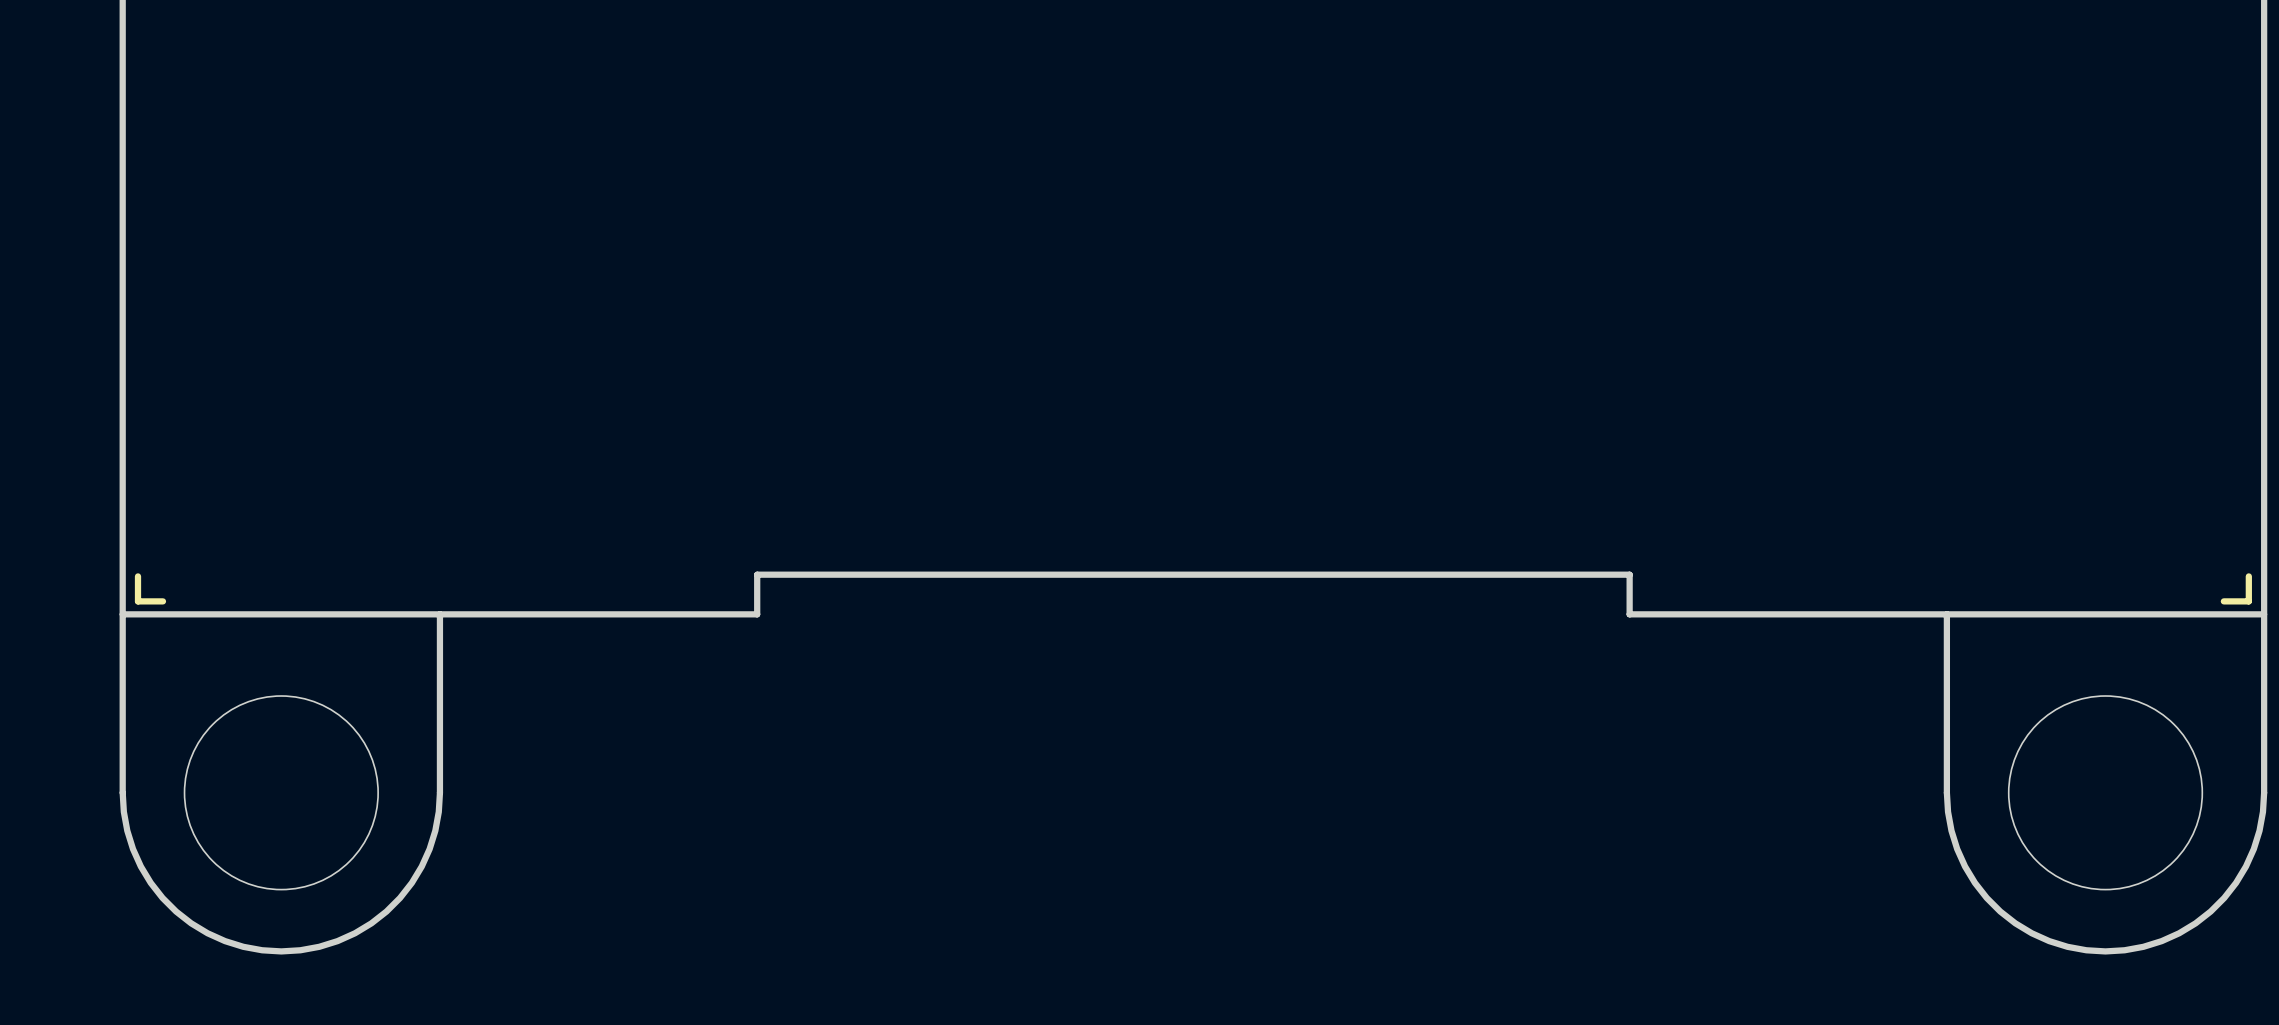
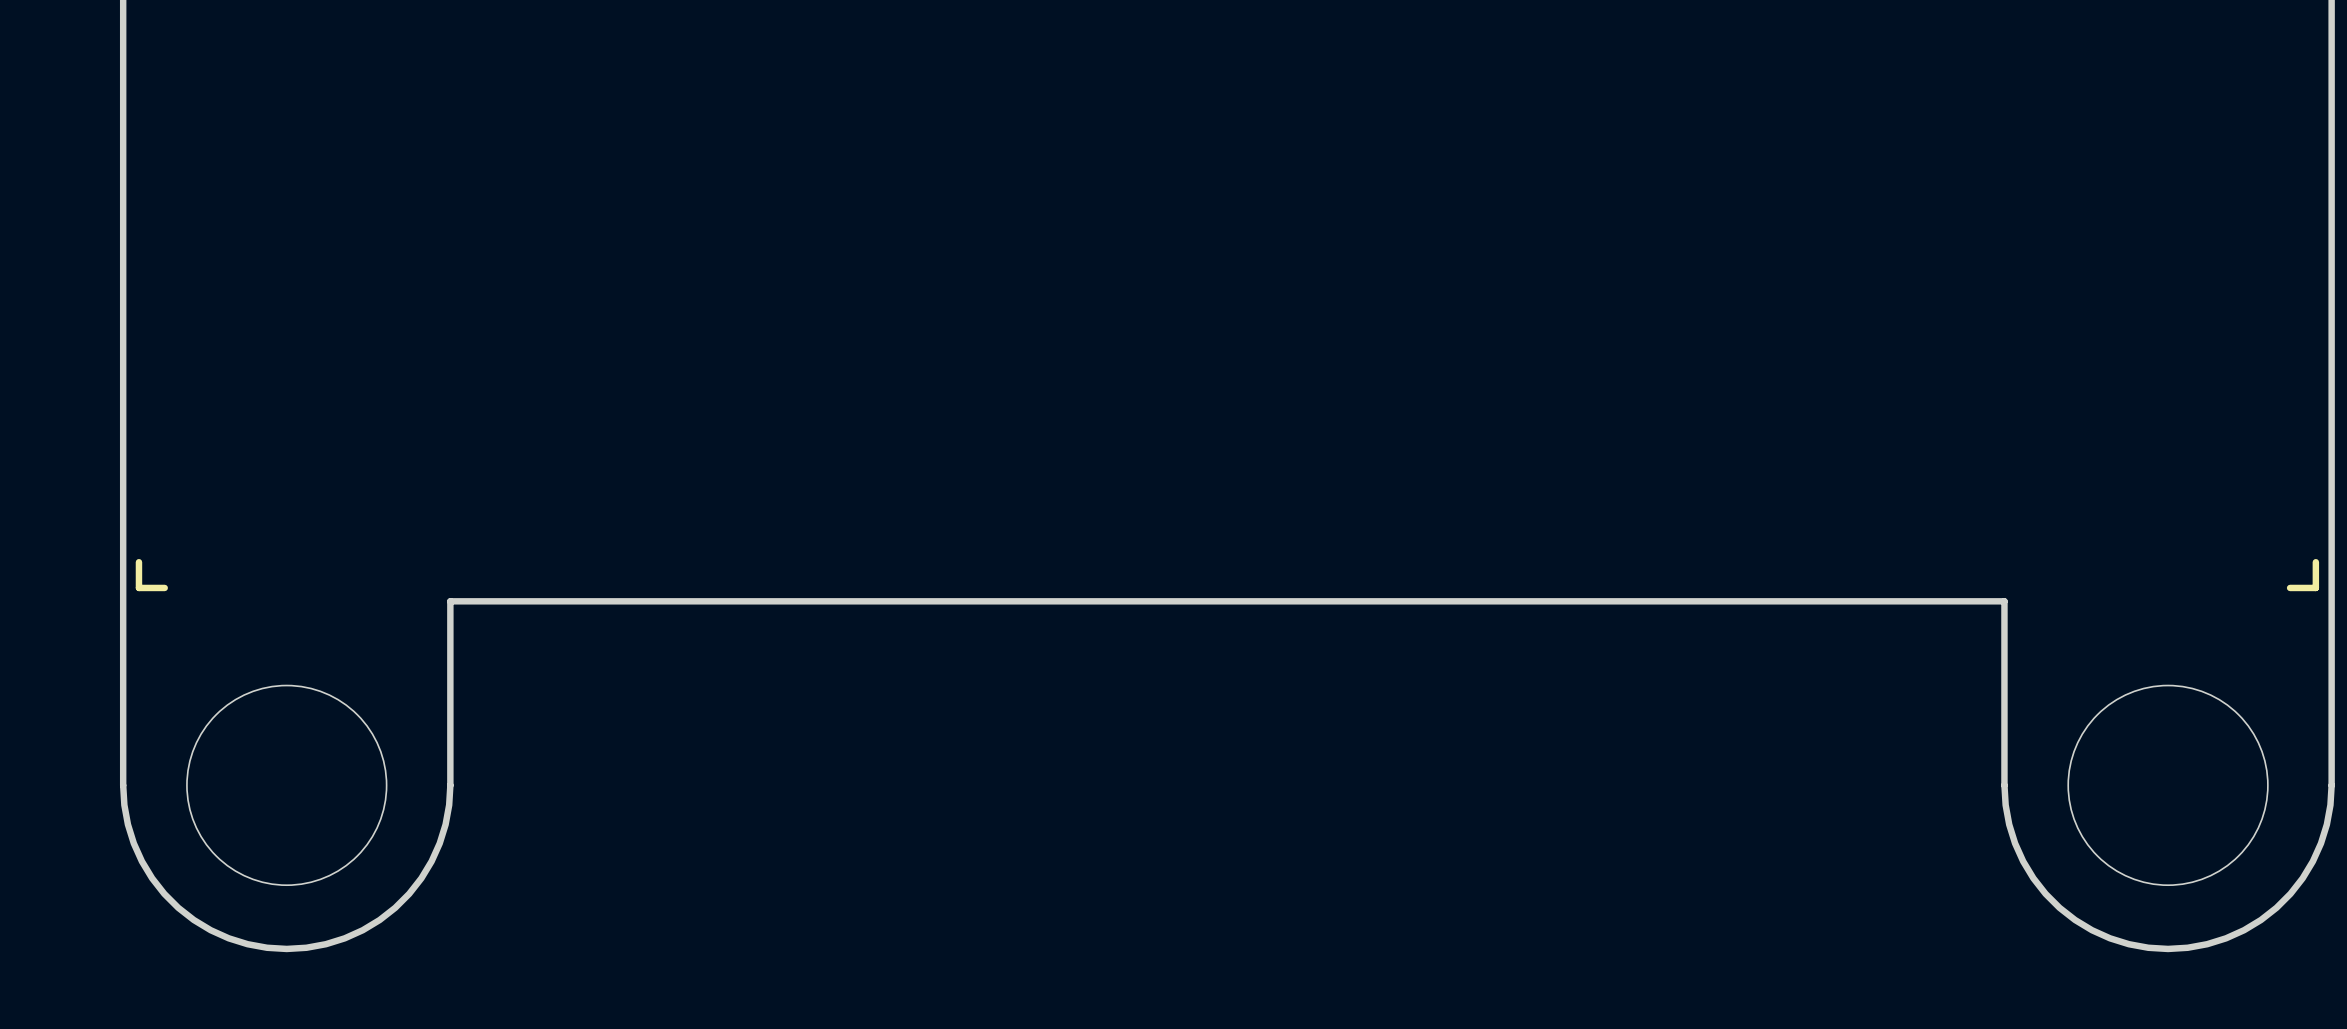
board edge: (439, 614) (122, 614) -> none
board edge: (1629, 614) (1629, 574) (757, 574) (757, 614) -> (1677, 601) (777, 601)
board edge: (2264, 614) (1946, 614) -> none

